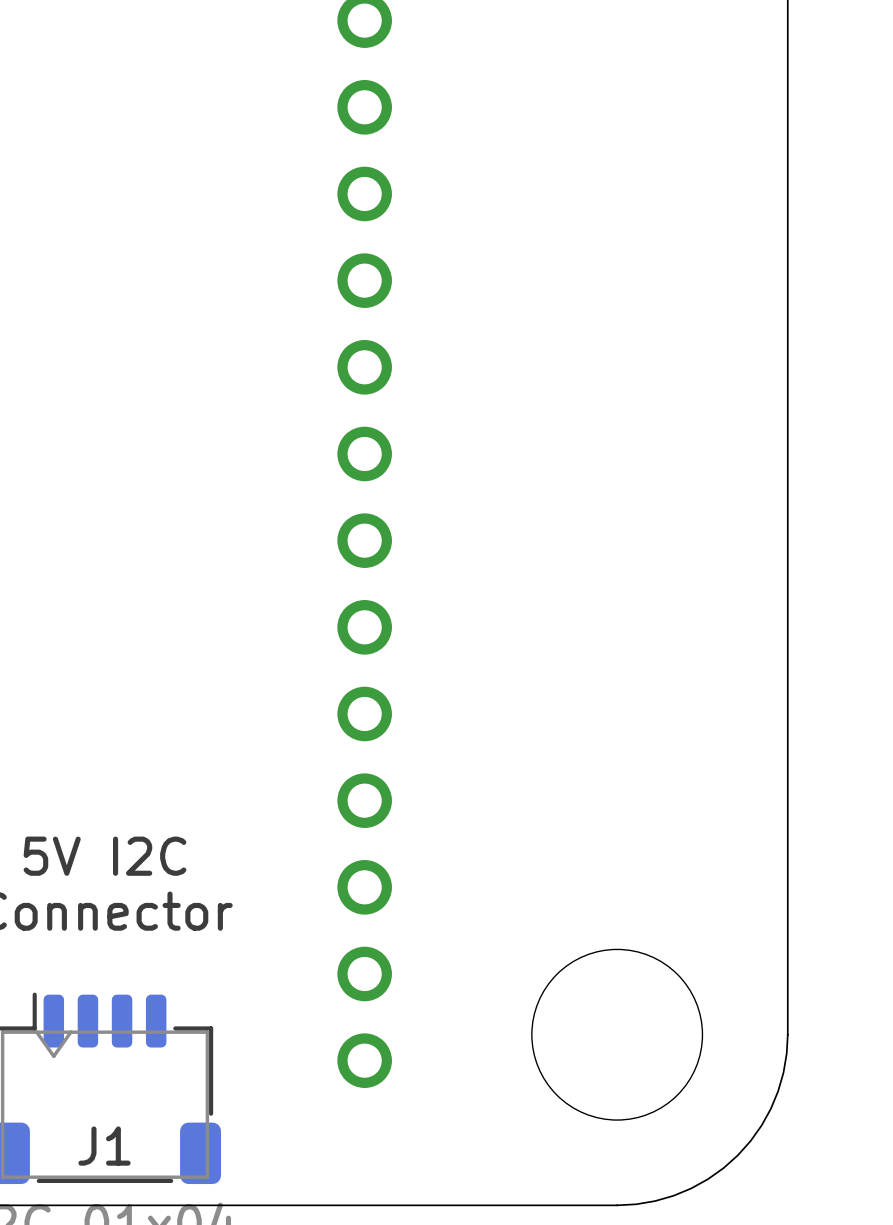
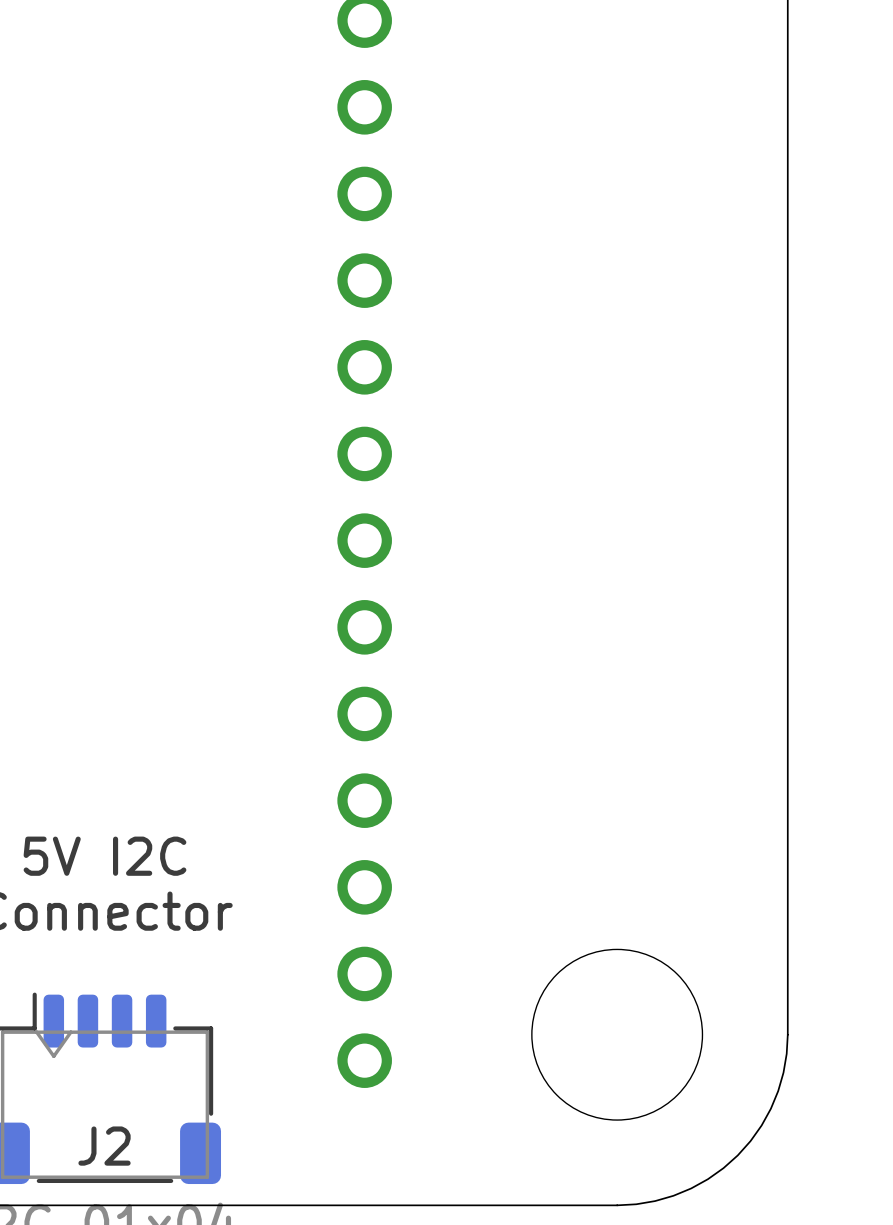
J1 name: J1 (104, 1146) -> J2 (104, 1146)

